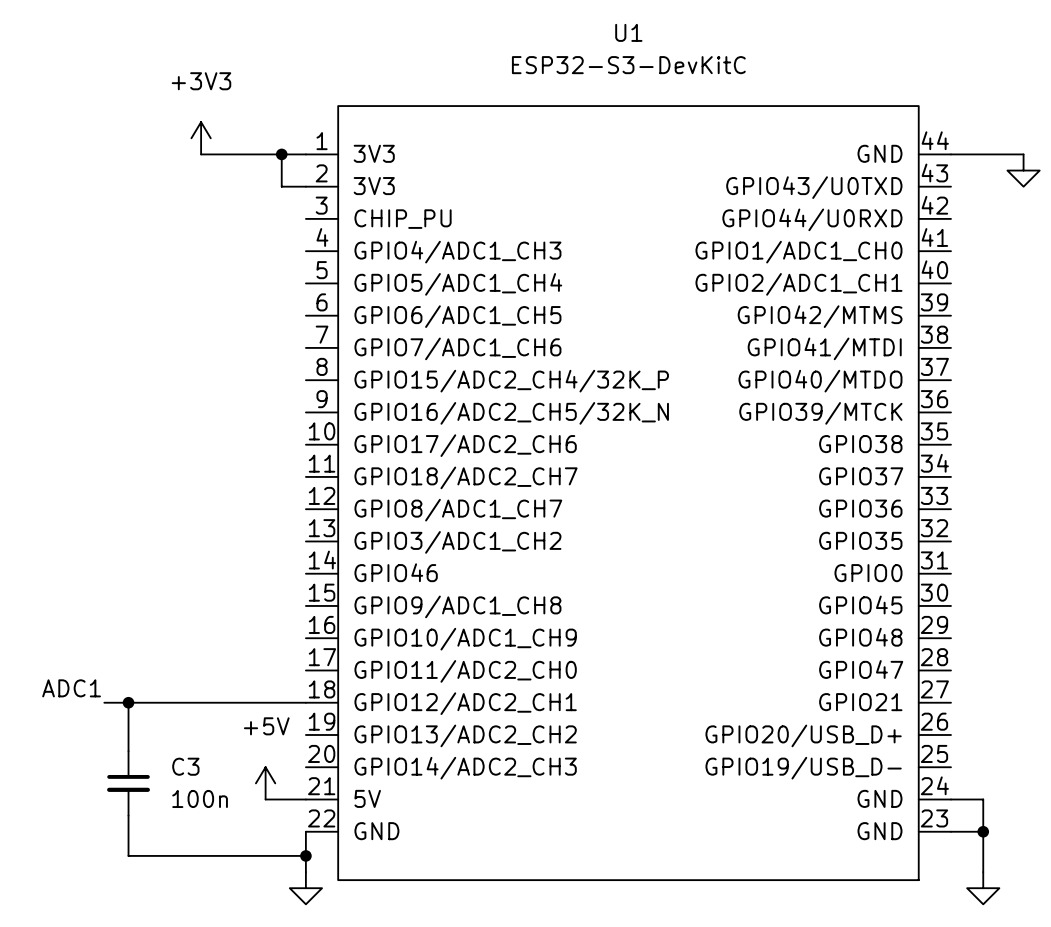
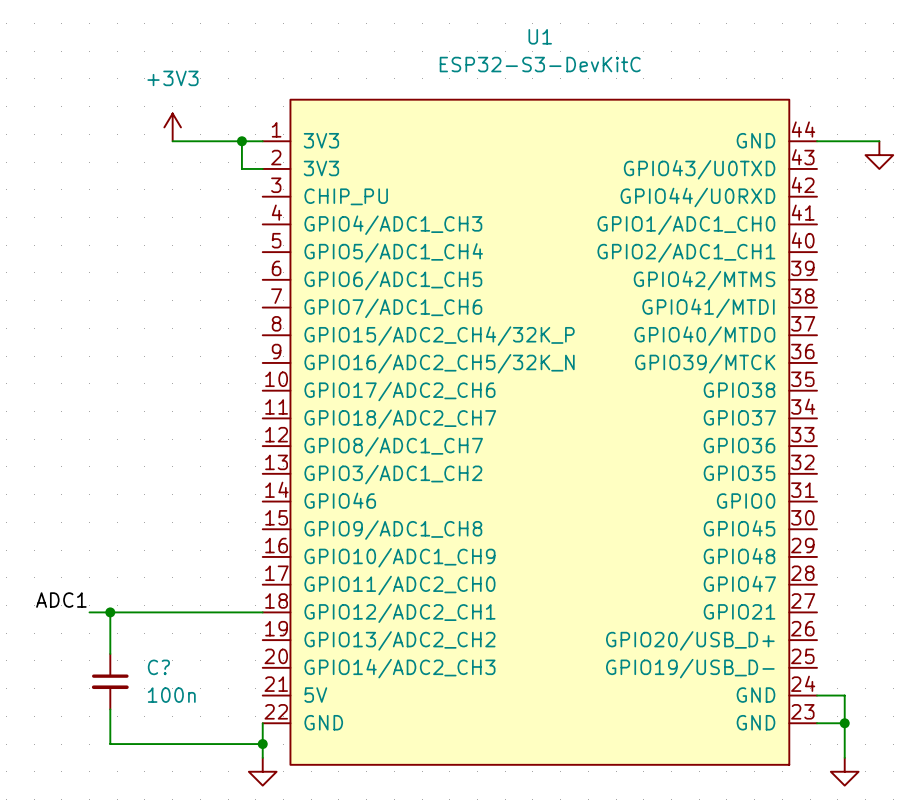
C3 name: C3 (185, 766) -> C? (158, 667)
power symbol: +5V (265, 783) -> none
wire: (265, 799) (305, 799) -> none

